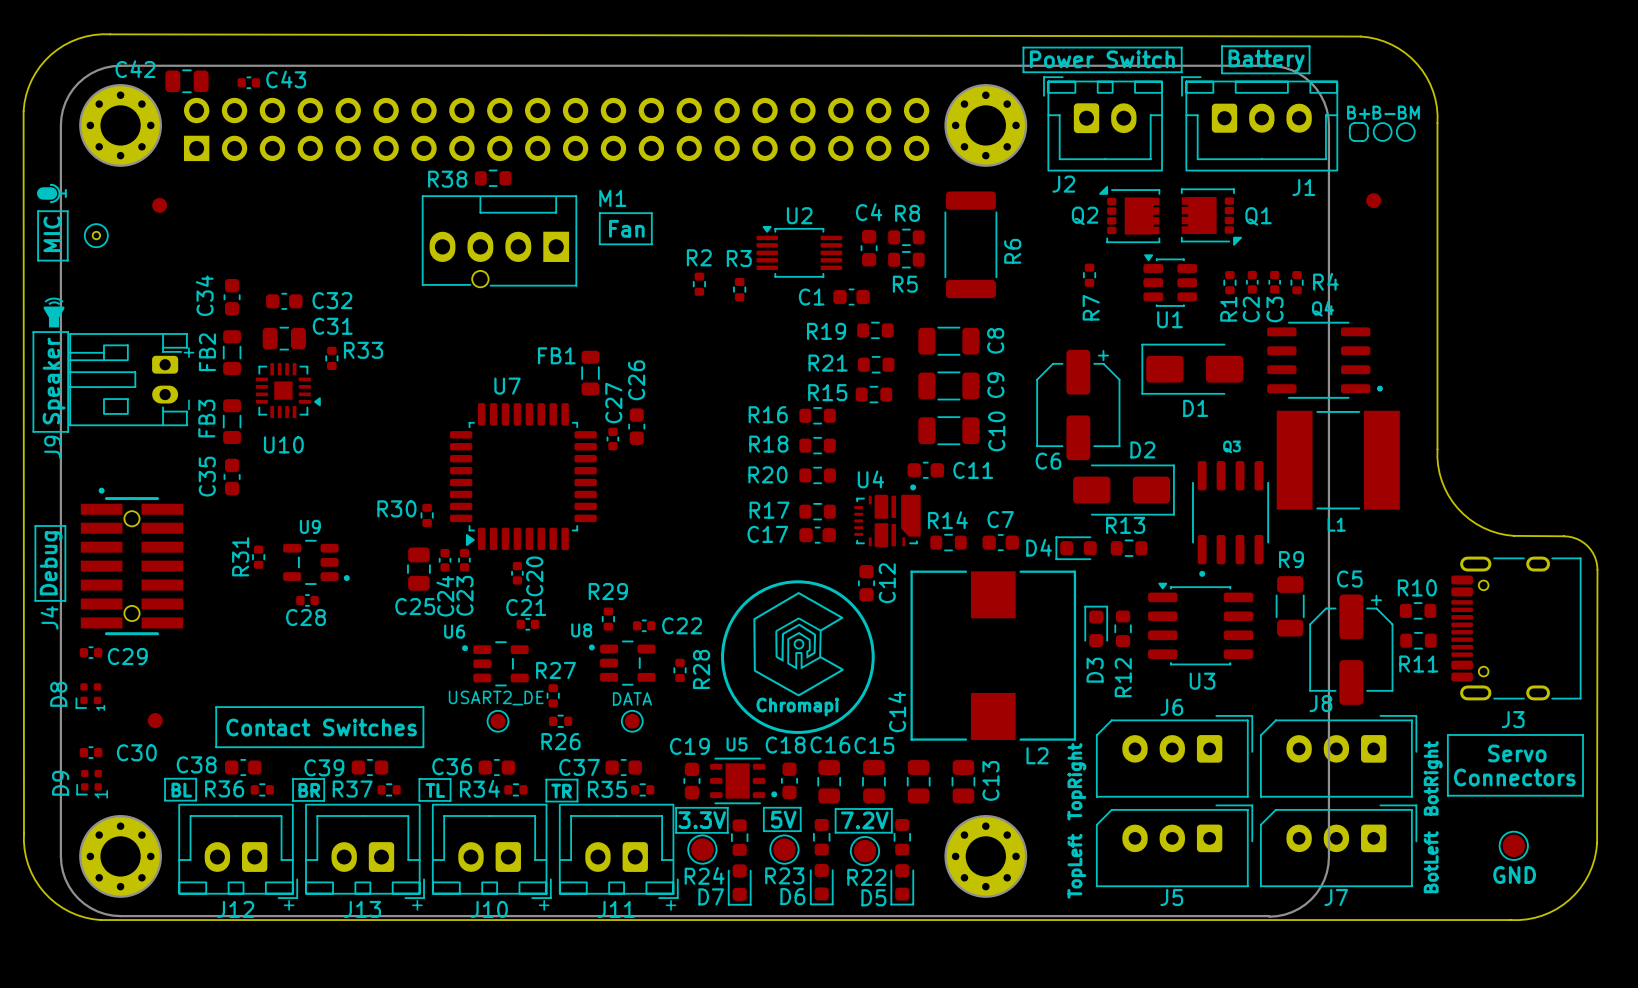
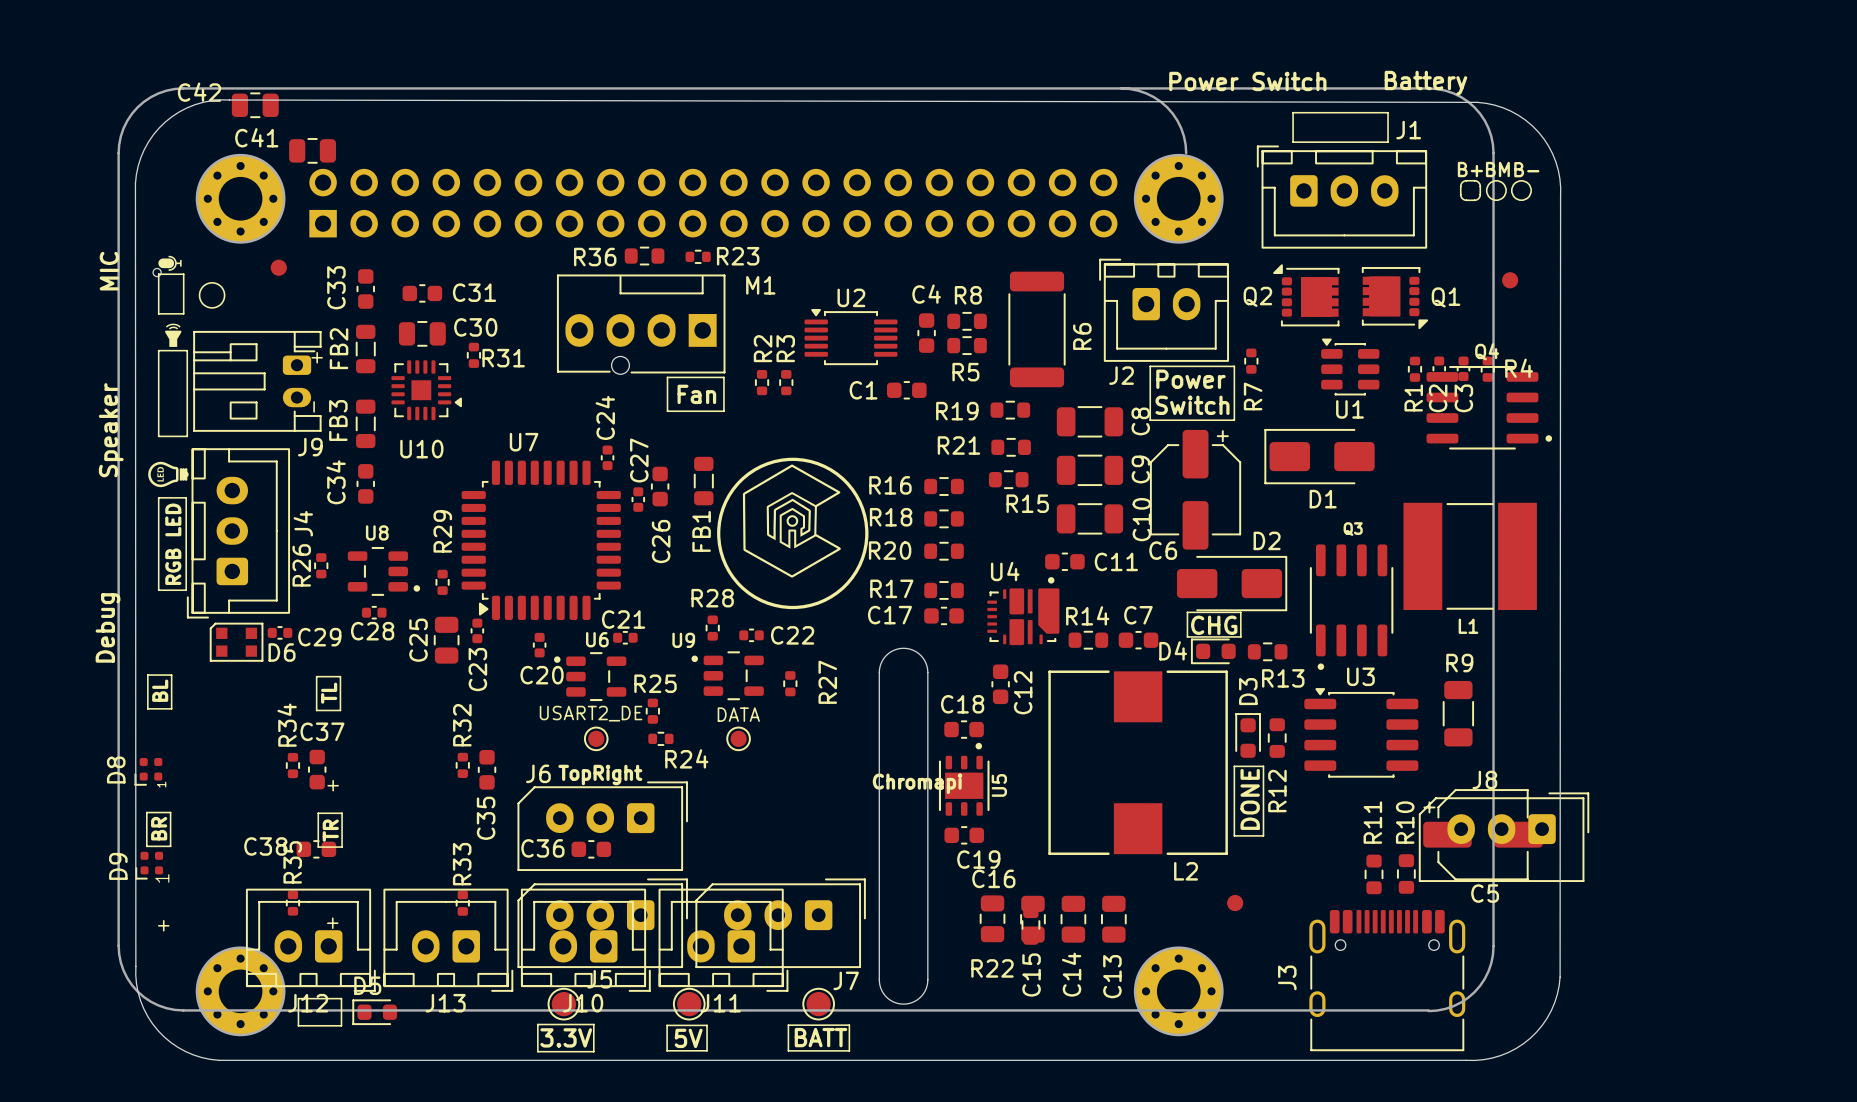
board edge: (110, 34) (1360, 36) (1376, 39) (1398, 48) (1411, 58) (1422, 70) (1433, 91) (1436, 107) (1437, 457) (1441, 480) (1448, 495) (1457, 508) (1469, 519) (1483, 527) (1498, 533) (1514, 535) (1572, 537) (1587, 546) (1596, 561) (1597, 843) (1592, 866) (1585, 881) (1569, 899) (1556, 909) (1542, 915) (1518, 920) (100, 920) (77, 915) (62, 908) (50, 898) (34, 879) (28, 865) (23, 841) (23, 111) (26, 95) (31, 80) (40, 66) (51, 54) (64, 45) (78, 38) (94, 34) (110, 34) -> (229, 100) (211, 100) (195, 104) (179, 111) (165, 122) (153, 134) (144, 149) (138, 165) (135, 183) (135, 975) (138, 992) (147, 1016) (158, 1030) (170, 1042) (193, 1054) (219, 1060) (1474, 1060) (1500, 1055) (1516, 1048) (1530, 1038) (1542, 1025) (1554, 1002) (1560, 977) (1560, 187) (1558, 170) (1552, 153) (1543, 138) (1525, 120) (1502, 107) (1477, 102) (229, 100)
line: (1221, 46) (1309, 46) (1309, 73) (1221, 73) (1221, 46) -> (1293, 112) (1388, 112) (1388, 142) (1293, 142) (1293, 112)
line: (1023, 47) (1181, 47) (1181, 72) (1023, 72) (1023, 47) -> none
line: none -> (1121, 88) (1146, 93) (1167, 107) (1181, 128) (1186, 153)
C43: (248, 82) -> none
text position: B+ (1358, 112) -> B+ (1470, 169)
text position: B- (1384, 112) -> B- (1526, 169)
text position: BM (1408, 112) -> BM (1497, 169)
line: (1355, 122) (1362, 122) (1363, 123) (1366, 125) (1367, 136) (1365, 140) (1354, 140) (1350, 138) (1349, 127) (1351, 124) (1353, 123) (1354, 123) (1355, 122) -> none
drawing: [1372, 122, 1416, 142] -> none
C41: none -> (312, 150)
J2 position: (1103, 123) -> (1164, 310)
J1 position: (1259, 123) -> (1342, 197)
part position: (120, 125) -> (240, 198)
part position: (985, 125) -> (1178, 198)
part position: (556, 129) -> (713, 203)
line: none -> (1466, 180) (1474, 180) (1476, 180) (1479, 183) (1480, 195) (1477, 199) (1465, 200) (1461, 197) (1460, 184) (1462, 181) (1464, 180) (1465, 180) (1466, 180)
drawing: none -> [1485, 180, 1532, 202]
R38: (493, 178) -> none
drawing: [37, 183, 67, 204] -> none
J1 name position: J1 (1303, 187) -> J1 (1408, 130)
M1 name position: M1 (612, 198) -> M1 (760, 285)
part position: (1373, 200) -> (1510, 280)
part position: (159, 205) -> (278, 267)
line: (38, 211) (67, 211) (67, 260) (38, 260) (38, 211) -> none
line: (599, 213) (651, 213) (651, 244) (599, 244) (599, 213) -> (667, 377) (723, 377) (723, 411) (667, 411) (667, 377)
Q2 position: (1129, 214) -> (1306, 295)
Q1 position: (1211, 217) -> (1394, 298)
drawing: none -> [158, 255, 182, 271]
text position: Fan (626, 228) -> Fan (696, 394)
drawing position: (96, 235) -> (212, 295)
line: none -> (158, 274) (183, 274) (183, 313) (158, 313) (158, 274)
R5 position: (906, 237) -> (967, 321)
M1 position: (499, 241) -> (641, 324)
R6 position: (970, 244) -> (1037, 329)
C4 position: (869, 248) -> (926, 333)
C33: none -> (365, 288)
U2 position: (799, 251) -> (851, 337)
R2 name rotation: 0° (699, 257) -> 90° counterclockwise (763, 348)
R3 name rotation: 0° (739, 258) -> 90° counterclockwise (785, 348)
R8 position: (906, 259) -> (967, 345)
R7 position: (1089, 275) -> (1251, 361)
U1 position: (1170, 280) -> (1350, 366)
drawing: none -> [165, 323, 182, 347]
R1 position: (1229, 282) -> (1414, 369)
C2 position: (1252, 282) -> (1439, 368)
C3 position: (1274, 282) -> (1463, 368)
R4 position: (1297, 282) -> (1487, 369)
R2 position: (699, 284) -> (762, 382)
R3 position: (739, 289) -> (786, 382)
drawing: [43, 297, 65, 328] -> none
C34 position: (232, 297) -> (365, 483)
C1 position: (851, 297) -> (906, 390)
C32: (284, 301) -> none
line: none -> (158, 350) (158, 436) (187, 436) (187, 350) (158, 350)
line: none -> (1150, 366) (1234, 366) (1234, 420) (1150, 420) (1150, 366)
C31 footprint: [262, 326, 306, 351] -> [402, 284, 443, 303]
R19 position: (875, 330) -> (1010, 410)
line: (33, 332) (68, 332) (68, 431) (33, 431) (33, 332) -> none
text: none -> Power (1190, 379)
C8 position: (948, 341) -> (1089, 421)
R33 name rotation: 0° (363, 350) -> 90° counterclockwise (462, 864)
text position: + (188, 352) -> + (317, 357)
FB2 position: (232, 352) -> (365, 349)
FB1 name rotation: 0° (556, 355) -> 90° counterclockwise (701, 531)
FB1 name position: FB1 (556, 355) -> FB1 (701, 531)
text: none -> Switch (1192, 405)
R33 position: (331, 358) -> (462, 903)
R21 position: (876, 364) -> (1011, 447)
D1 position: (1192, 369) -> (1319, 456)
FB1 position: (590, 373) -> (703, 481)
J9 position: (128, 379) -> (257, 381)
C26 name position: C26 (636, 380) -> C26 (661, 541)
C9 position: (948, 385) -> (1089, 470)
U10 position: (288, 390) -> (426, 390)
R15 name position: R15 (827, 392) -> R15 (1027, 503)
R15 position: (873, 394) -> (1008, 479)
text position: - (188, 404) -> - (314, 406)
C6 position: (1078, 405) -> (1195, 489)
drawing: none -> [717, 457, 869, 610]
drawing: none -> [148, 461, 189, 488]
R16 position: (817, 415) -> (944, 486)
FB3 position: (232, 421) -> (365, 423)
C26 position: (636, 426) -> (660, 486)
C10 position: (948, 430) -> (1089, 518)
C27 position: (612, 439) -> (638, 499)
line: none -> (158, 497) (158, 590) (186, 590) (186, 497) (158, 497)
R18 position: (817, 445) -> (944, 518)
J9 name rotation: 0° (52, 447) -> 90° clockwise (310, 447)
J9 name position: J9 (52, 447) -> J9 (310, 447)
D2 name position: D2 (1142, 449) -> D2 (1267, 540)
L1 position: (1338, 460) -> (1470, 556)
C11 position: (925, 470) -> (1064, 561)
R20 position: (817, 475) -> (944, 551)
C35 name position: C35 (207, 476) -> C35 (486, 818)
C35 position: (232, 476) -> (487, 769)
U7 position: (523, 476) -> (541, 540)
text: none -> RGB LED (173, 544)
J4 footprint: [80, 487, 184, 636] -> [186, 448, 291, 619]
D2 position: (1123, 490) -> (1232, 583)
R17 position: (817, 511) -> (944, 590)
R30: (427, 515) -> none
U4 position: (887, 515) -> (1023, 611)
Q3 position: (1230, 518) -> (1351, 607)
line: (35, 525) (65, 525) (65, 600) (35, 600) (35, 525) -> none
R13 name position: R13 (1125, 525) -> R13 (1283, 678)
U9 name position: U9 (310, 526) -> U9 (683, 640)
C17 position: (817, 535) -> (944, 615)
R14 position: (948, 542) -> (1088, 640)
C7 position: (1000, 542) -> (1138, 640)
line: none -> (1187, 612) (1240, 612) (1240, 636) (1187, 636) (1187, 612)
D4 position: (1076, 548) -> (1213, 651)
R13 position: (1129, 548) -> (1267, 651)
R31 name rotation: 0° (240, 556) -> 90° clockwise (503, 358)
R31 position: (258, 557) -> (473, 355)
C24 position: (445, 560) -> (607, 457)
C23 position: (464, 560) -> (477, 630)
text: none -> CHG (1214, 625)
U9 rotation: 0° (316, 562) -> 180° (727, 675)
U9 position: (316, 562) -> (727, 675)
C25 position: (418, 569) -> (446, 640)
C20 position: (517, 573) -> (539, 645)
C20 name rotation: 0° (534, 576) -> 90° clockwise (542, 675)
C5 name position: C5 (1349, 578) -> C5 (1485, 893)
drawing: [721, 580, 875, 734] -> none
C12 position: (866, 583) -> (1000, 684)
C12 name position: C12 (887, 583) -> C12 (1023, 692)
R29 name rotation: 0° (608, 591) -> 90° counterclockwise (442, 531)
C24 name position: C24 (445, 596) -> C24 (605, 417)
C28 position: (307, 600) -> (374, 612)
board edge: none -> (879, 672) (879, 982) (883, 993) (889, 999) (897, 1003) (906, 1003) (919, 998) (925, 991) (927, 982) (927, 669) (920, 655) (912, 650) (903, 648) (894, 650) (886, 655) (881, 663) (879, 672)
line: none -> (147, 675) (171, 675) (171, 708) (147, 708) (147, 675)
C25 name rotation: 0° (415, 606) -> 90° counterclockwise (418, 640)
R9 position: (1290, 606) -> (1458, 713)
line: none -> (316, 676) (340, 676) (340, 710) (316, 710) (316, 676)
R10 rotation: 0° (1418, 610) -> 90° clockwise (1406, 874)
R10 position: (1418, 610) -> (1406, 874)
J4 name position: J4 (49, 617) -> J4 (303, 523)
R29 position: (608, 619) -> (442, 582)
C21 position: (527, 624) -> (625, 637)
U3 position: (1200, 624) -> (1361, 732)
C22 position: (644, 625) -> (751, 635)
D3 position: (1096, 626) -> (1248, 735)
R12 position: (1123, 628) -> (1277, 738)
J3 rotation: 0° (1516, 628) -> 90° clockwise (1387, 980)
J3 position: (1516, 628) -> (1387, 980)
U8 name position: U8 (581, 630) -> U8 (377, 532)
U6 name position: U6 (454, 631) -> U6 (597, 639)
R25: none -> (652, 711)
R11 rotation: 0° (1418, 640) -> 90° clockwise (1374, 874)
R11 position: (1418, 640) -> (1374, 874)
drawing position: (798, 644) -> (791, 521)
C5 rotation: 0° (1351, 649) -> 90° counterclockwise (1483, 834)
C5 position: (1351, 649) -> (1483, 834)
C29 position: (91, 652) -> (280, 632)
L2 position: (993, 655) -> (1138, 762)
U6 position: (495, 663) -> (590, 676)
U8 rotation: 0° (622, 663) -> 180° (383, 571)
U8 position: (622, 663) -> (383, 571)
R11 name position: R11 (1418, 664) -> R11 (1372, 822)
R28 name rotation: 0° (701, 669) -> 90° clockwise (712, 598)
R27 name rotation: 0° (556, 670) -> 90° counterclockwise (827, 682)
R28 position: (680, 670) -> (712, 628)
D3 name position: D3 (1095, 670) -> D3 (1248, 691)
U3 name position: U3 (1202, 681) -> U3 (1360, 676)
R32: none -> (462, 765)
line: none -> (1234, 766) (1234, 835) (1263, 835) (1263, 766) (1234, 766)
R27 position: (553, 695) -> (790, 683)
text position: USART2_DE (496, 698) -> USART2_DE (591, 713)
text: none -> TopRight (600, 775)
text position: DATA (632, 698) -> DATA (738, 714)
line: (216, 707) (423, 707) (423, 747) (216, 747) (216, 707) -> none
J6 name position: J6 (1171, 707) -> J6 (538, 773)
text: none -> + (333, 785)
C14 name position: C14 (897, 711) -> C14 (1071, 974)
part: (155, 720) -> none
part position: (498, 721) -> (596, 738)
R26 rotation: 0° (560, 721) -> 90° clockwise (321, 565)
R26 position: (560, 721) -> (321, 565)
part position: (632, 721) -> (738, 738)
text: none -> DONE (1250, 799)
text: Contact Switches (321, 727) -> none
line: none -> (146, 812) (170, 812) (170, 846) (146, 846) (146, 812)
line: none -> (318, 813) (342, 813) (342, 847) (318, 847) (318, 813)
line: (1447, 734) (1583, 734) (1583, 795) (1447, 795) (1447, 734) -> none
U5 name position: U5 (736, 744) -> U5 (999, 785)
C15 name rotation: 0° (874, 745) -> 90° counterclockwise (1031, 975)
C15 name position: C15 (874, 745) -> C15 (1031, 975)
C30 footprint: [79, 746, 103, 759] -> [398, 321, 446, 347]
C19 name position: C19 (689, 746) -> C19 (978, 859)
text: Servo (1517, 753) -> none
J6 position: (1174, 756) -> (602, 826)
C39: (369, 767) -> none
C37 rotation: 0° (623, 767) -> 90° clockwise (317, 769)
C37 position: (623, 767) -> (317, 769)
text: Connectors (1514, 777) -> none
line: (165, 778) (196, 778) (196, 800) (165, 800) (165, 778) -> none
text: BotRight (1433, 778) -> none
line: (293, 779) (324, 779) (324, 800) (293, 800) (293, 779) -> none
line: (419, 779) (450, 779) (450, 800) (419, 800) (419, 779) -> none
line: (546, 779) (577, 779) (577, 801) (546, 801) (546, 779) -> none
C19 rotation: 0° (691, 780) -> 90° clockwise (964, 835)
C19 position: (691, 780) -> (964, 835)
U5 rotation: 0° (743, 780) -> 90° counterclockwise (964, 779)
U5 position: (743, 780) -> (964, 779)
C18 rotation: 0° (789, 780) -> 90° clockwise (964, 729)
C18 position: (789, 780) -> (964, 729)
C13 name position: C13 (990, 780) -> C13 (1112, 976)
C16 position: (829, 781) -> (992, 918)
C15 position: (873, 781) -> (1032, 919)
C14 position: (918, 781) -> (1073, 919)
C13 position: (963, 781) -> (1113, 919)
text: TopRight (1076, 781) -> none
R36 footprint: [250, 783, 274, 797] -> [624, 246, 665, 266]
R37: (389, 789) -> none
R34 rotation: 0° (515, 789) -> 90° clockwise (292, 765)
R34 position: (515, 789) -> (292, 765)
R35 rotation: 0° (642, 789) -> 90° clockwise (292, 903)
R35 position: (642, 789) -> (292, 903)
text rotation: 0° (181, 790) -> 90° counterclockwise (160, 690)
text position: BL (181, 790) -> BL (160, 690)
text rotation: 0° (309, 790) -> 90° counterclockwise (159, 828)
text position: BR (309, 790) -> BR (159, 828)
text rotation: 0° (435, 790) -> 90° counterclockwise (329, 693)
text position: TL (435, 790) -> TL (329, 693)
text rotation: 0° (561, 791) -> 90° counterclockwise (330, 830)
text position: TR (561, 791) -> TR (330, 830)
line: (676, 807) (727, 807) (727, 832) (676, 832) (676, 807) -> (537, 1024) (593, 1024) (593, 1051) (537, 1051) (537, 1024)
line: (763, 807) (800, 807) (800, 831) (763, 831) (763, 807) -> (667, 1025) (707, 1025) (707, 1050) (667, 1050) (667, 1025)
line: (835, 808) (891, 808) (891, 832) (835, 832) (835, 808) -> (788, 1025) (849, 1025) (849, 1050) (788, 1050) (788, 1025)
part: none -> (1235, 903)
R23 footprint: [813, 818, 831, 856] -> [685, 249, 711, 264]
R24 footprint: [730, 819, 749, 856] -> [648, 731, 674, 746]
text position: 5V (783, 819) -> 5V (688, 1038)
text position: 3.3V (702, 820) -> 3.3V (566, 1037)
text: 7.2V (864, 820) -> none
text: none -> + (163, 925)
J5 position: (1174, 845) -> (602, 923)
J7 position: (1338, 845) -> (780, 923)
part: (1513, 845) -> none
part: (702, 849) -> none
part: (784, 849) -> none
part: (864, 851) -> none
part position: (120, 856) -> (240, 991)
part position: (985, 856) -> (1178, 991)
text: BotLeft (1431, 862) -> none
D6 footprint: [809, 863, 834, 906] -> [209, 622, 264, 662]
text: TopLeft (1076, 866) -> none
R24 name position: R24 (704, 875) -> R24 (686, 758)
R23 name position: R23 (784, 875) -> R23 (738, 256)
text: GND (1514, 875) -> none
D7: (739, 884) -> none
D5 rotation: 0° (902, 884) -> 90° clockwise (374, 1012)
D5 position: (902, 884) -> (374, 1012)
D6 name position: D6 (792, 896) -> D6 (282, 652)
J7 name position: J7 (1336, 897) -> J7 (846, 980)
line: none -> (298, 998) (341, 998) (341, 1025) (298, 1025) (298, 998)
text rotation: 0° (289, 905) -> 90° clockwise (332, 923)
text position: + (289, 905) -> + (332, 923)
text: + (417, 905) -> none
text: + (544, 905) -> none
text: + (671, 905) -> none
part: none -> (563, 1004)
part: none -> (689, 1004)
part: none -> (818, 1004)
text: none -> BATT (820, 1037)

